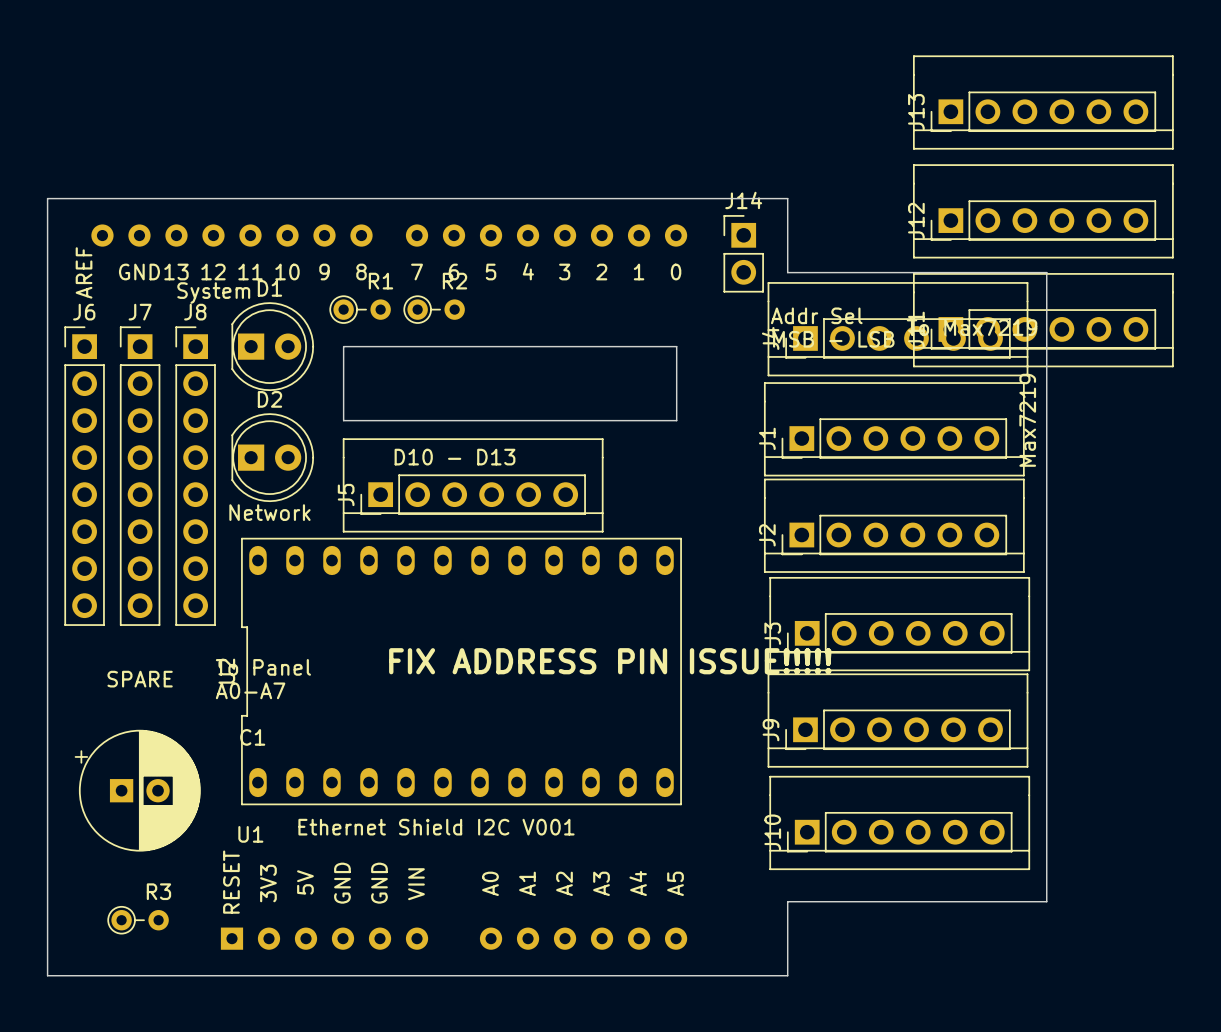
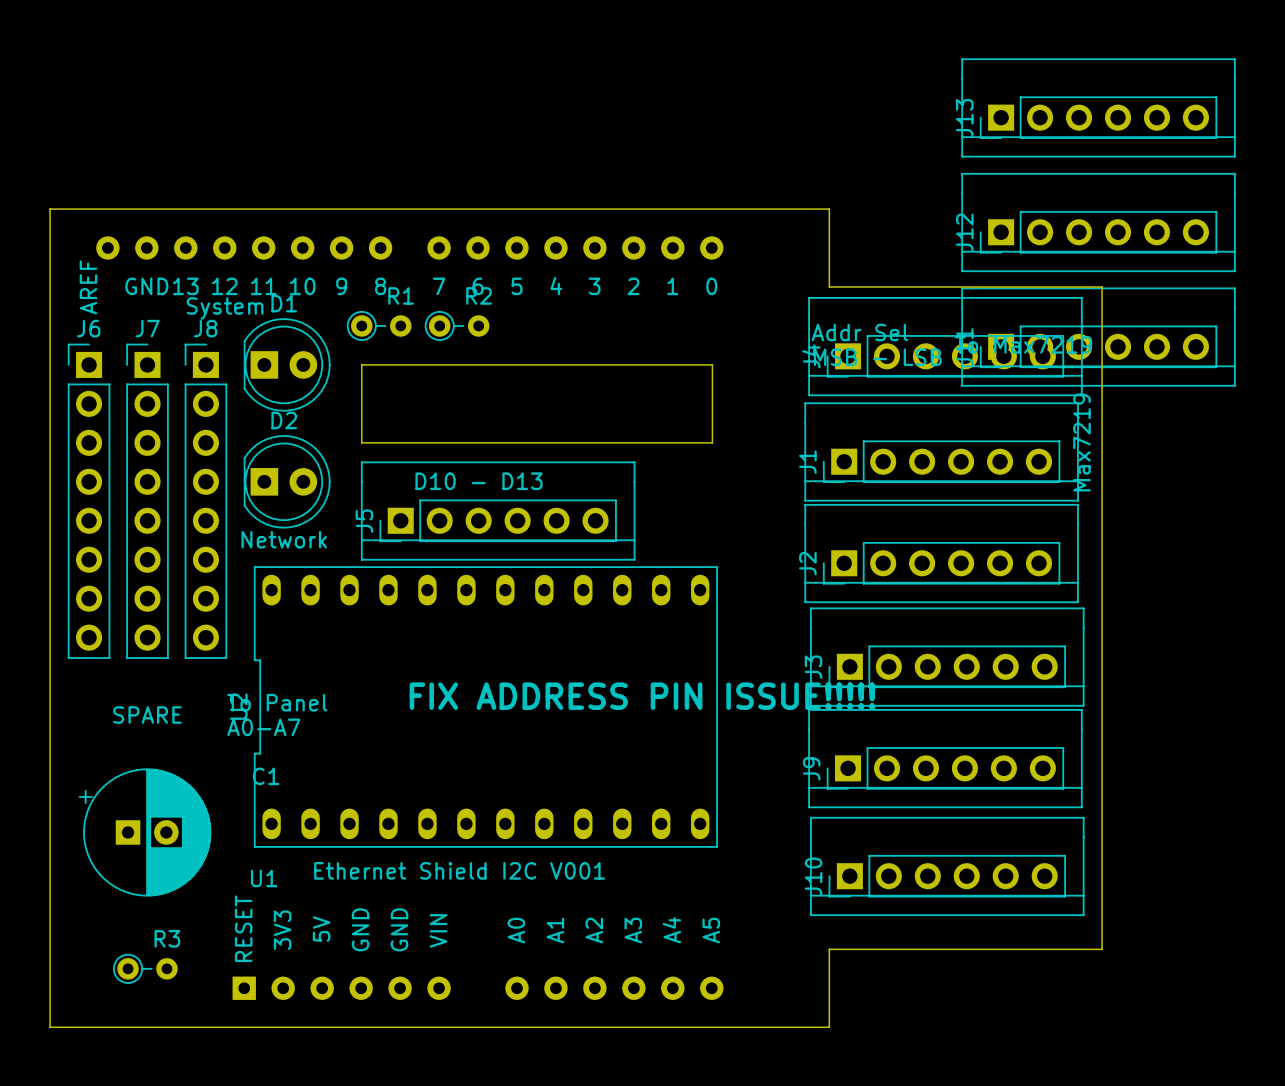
J14: (743, 253) -> none

